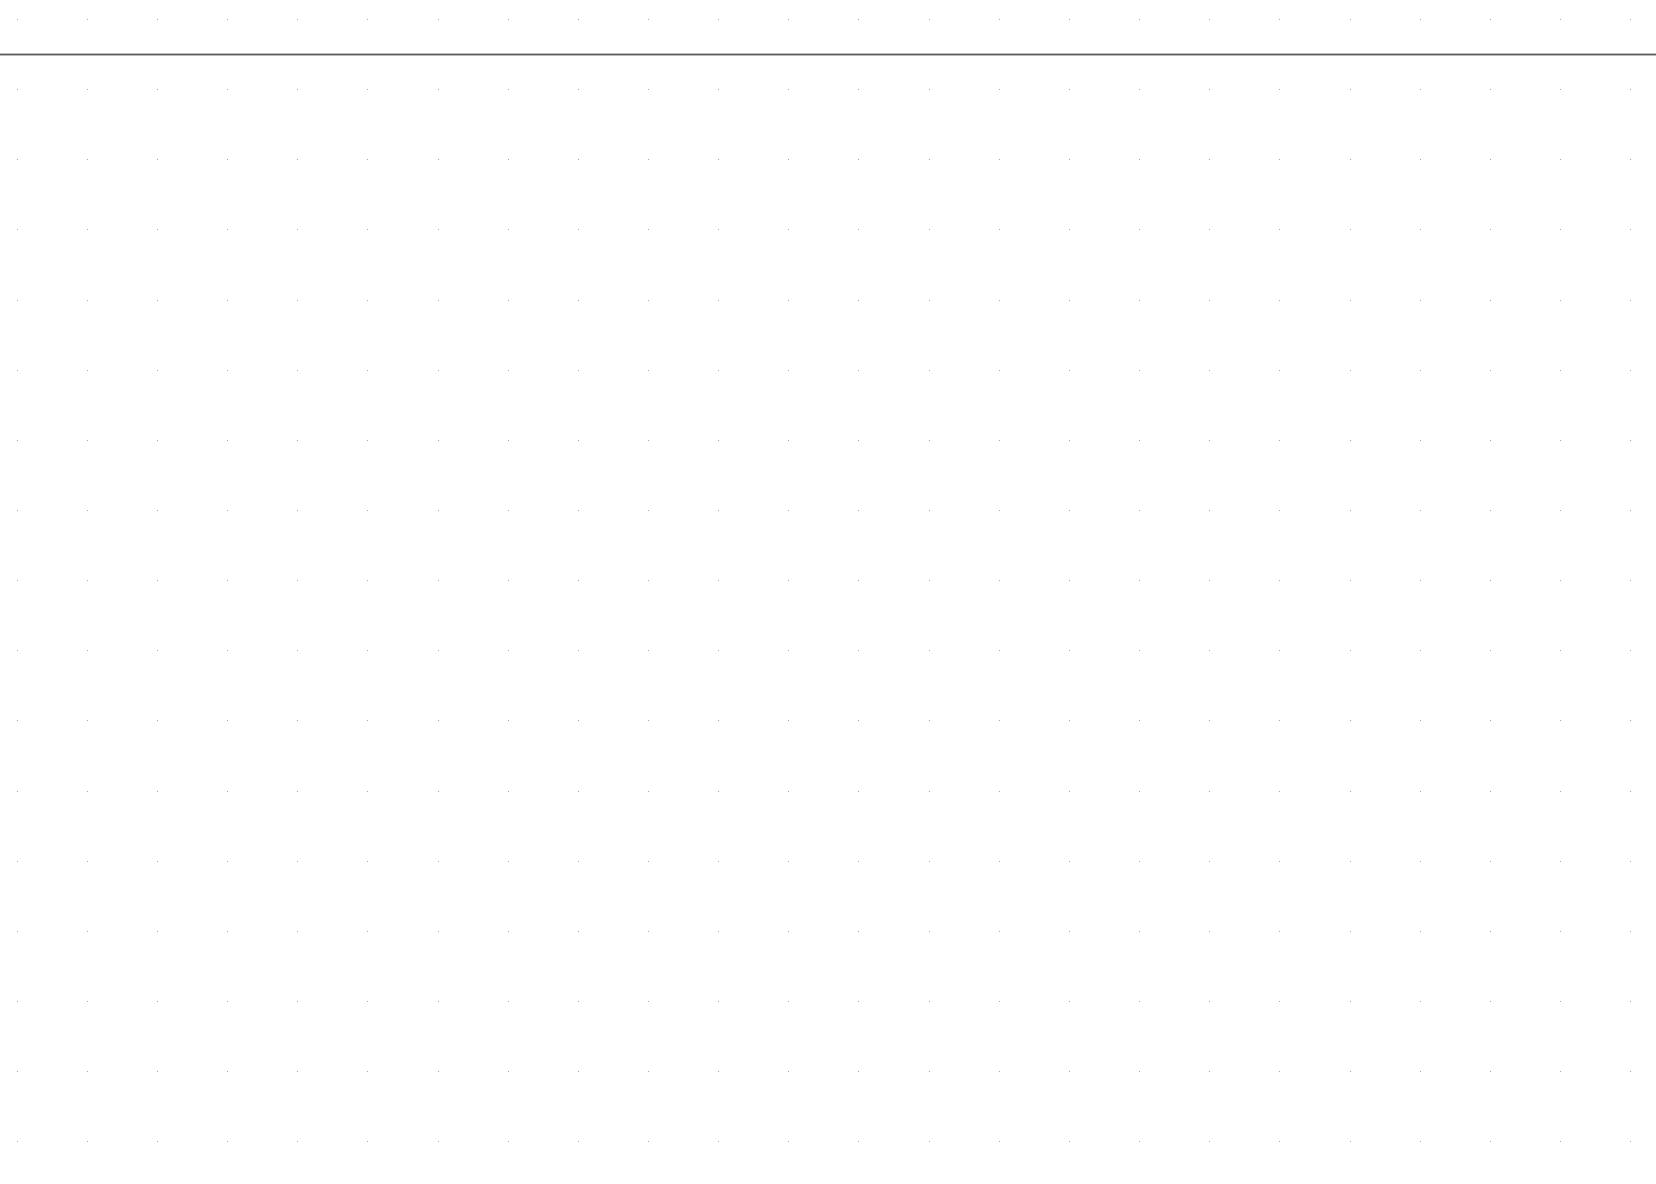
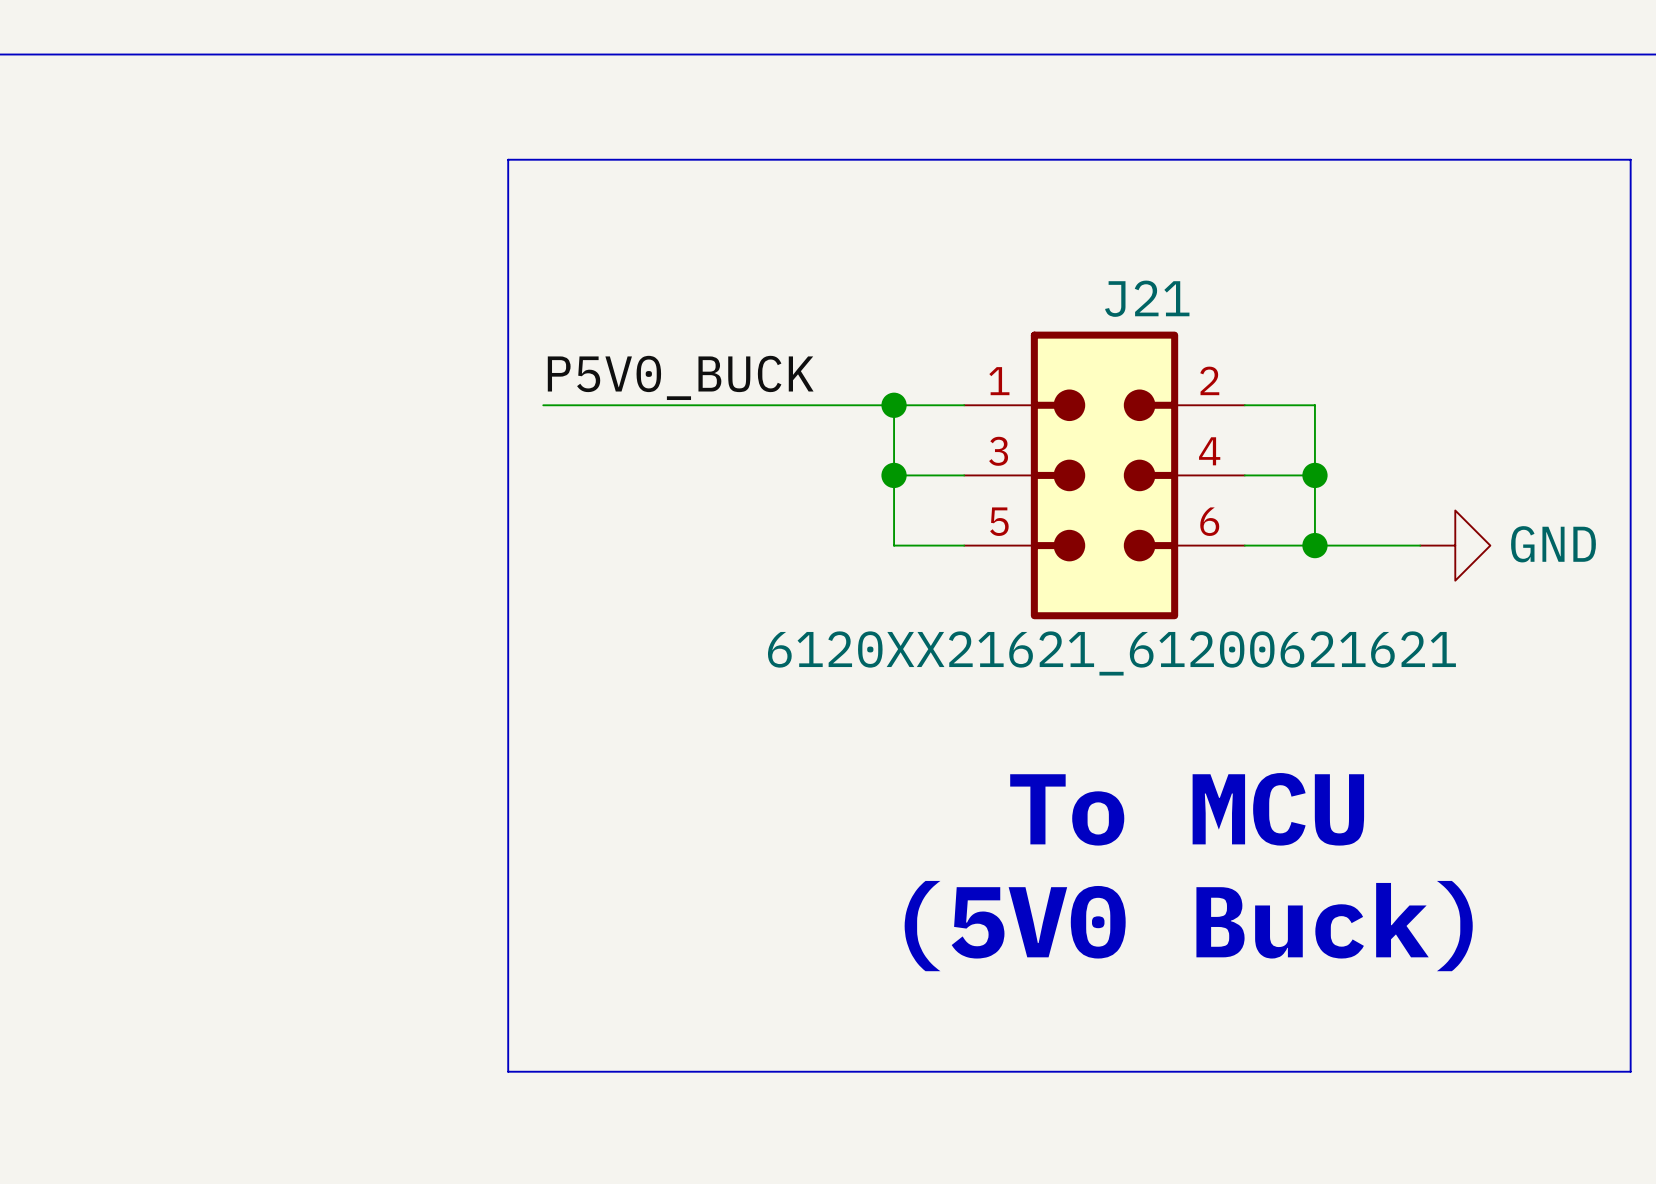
line: none -> (508, 159) (1630, 159) (1630, 1071) (508, 1071) (508, 159)
label: none -> P5V0_BUCK (680, 377)
wire: none -> (543, 405) (964, 405)
wire: none -> (894, 405) (894, 545) (964, 545)
junction: none -> (894, 405)
wire: none -> (1244, 405) (1314, 405) (1314, 545)
wire: none -> (894, 475) (964, 475)
junction: none -> (894, 475)
J21: none -> 6120XX21621_61200621621 (1104, 475)
wire: none -> (1244, 475) (1314, 475)
junction: none -> (1314, 475)
wire: none -> (1244, 545) (1420, 545)
junction: none -> (1314, 545)
power symbol: none -> GND (1455, 545)
text: none -> To MCU (1187, 809)
text: none -> (5V0 Buck) (1188, 926)

